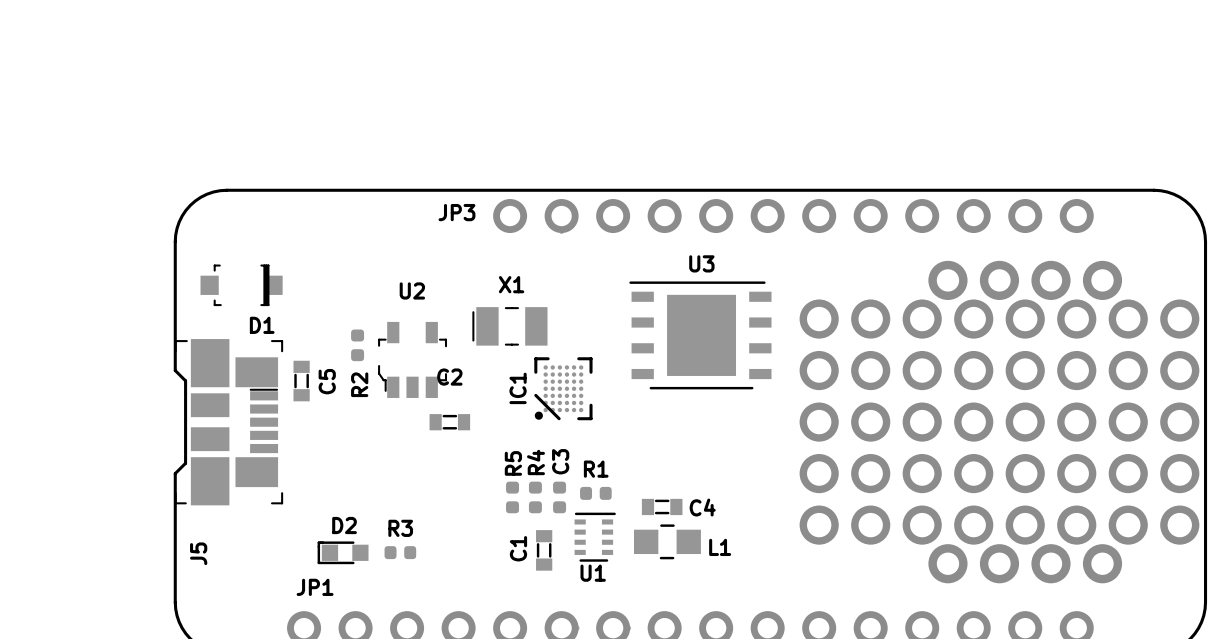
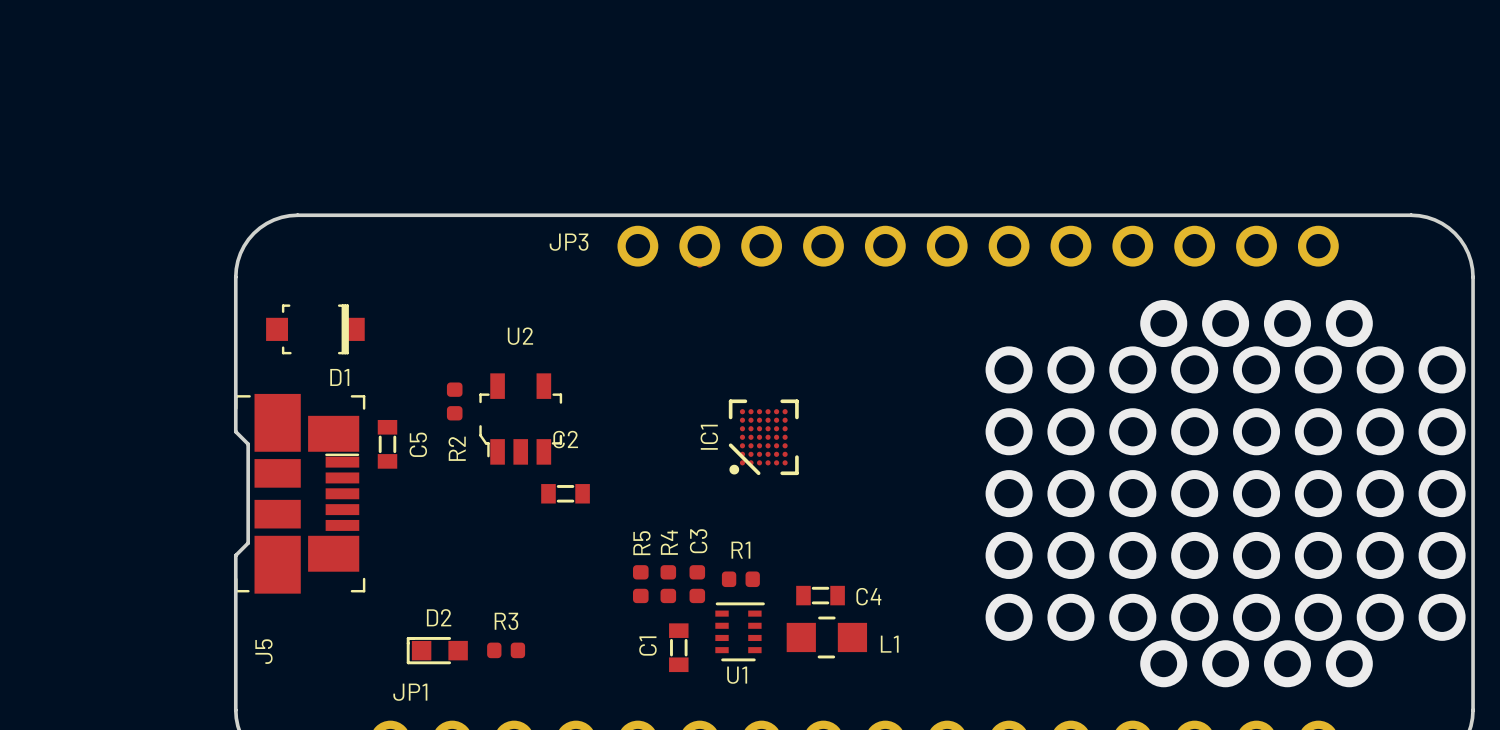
X1: (509, 326) -> none
U3: (700, 335) -> none
IC1 position: (563, 388) -> (763, 437)

